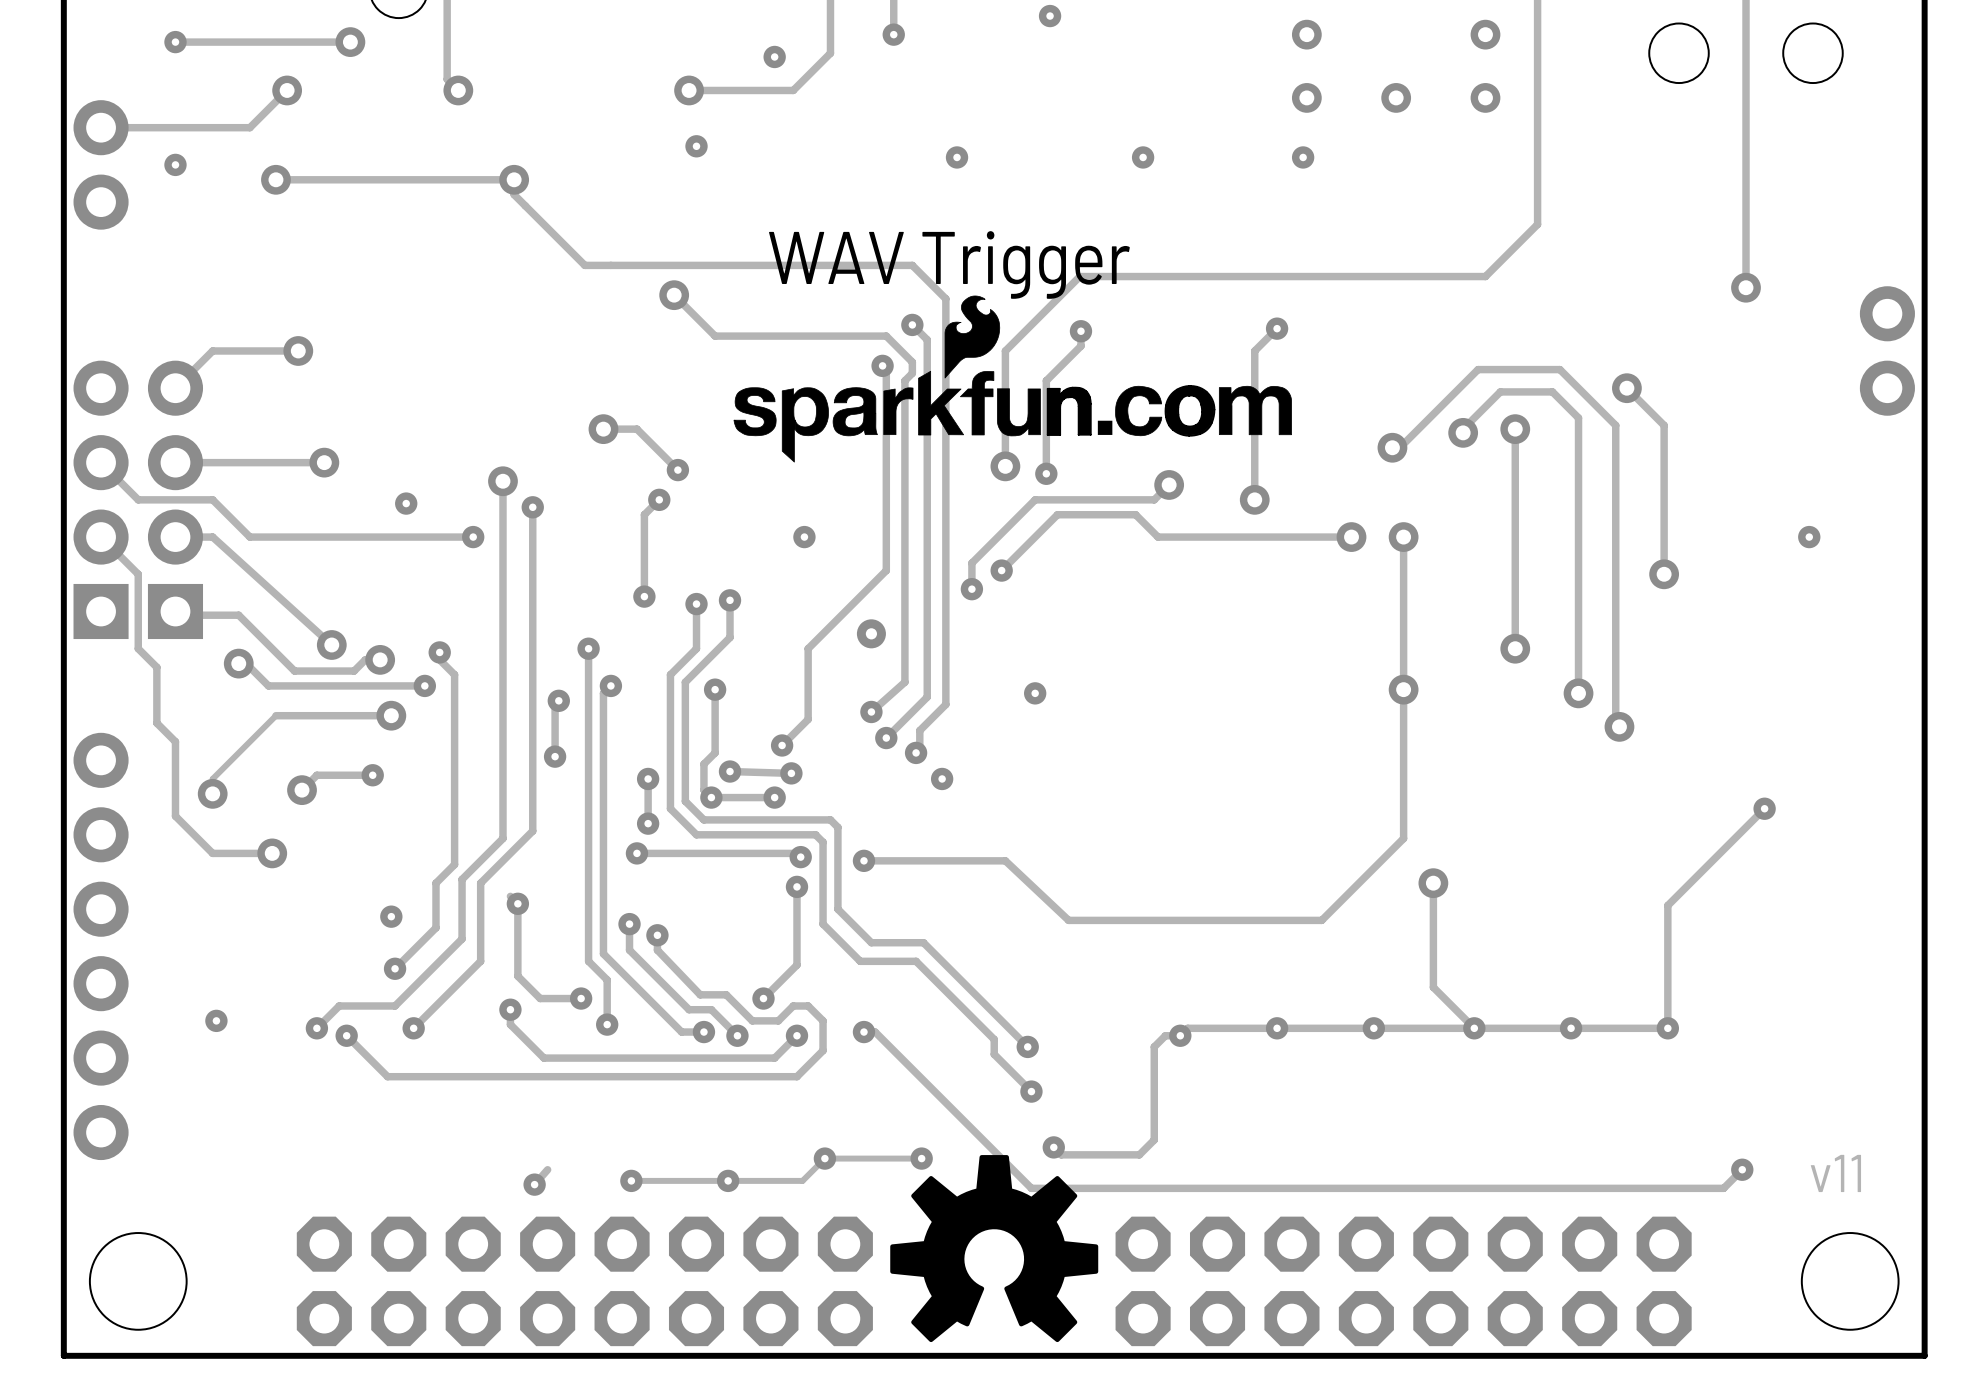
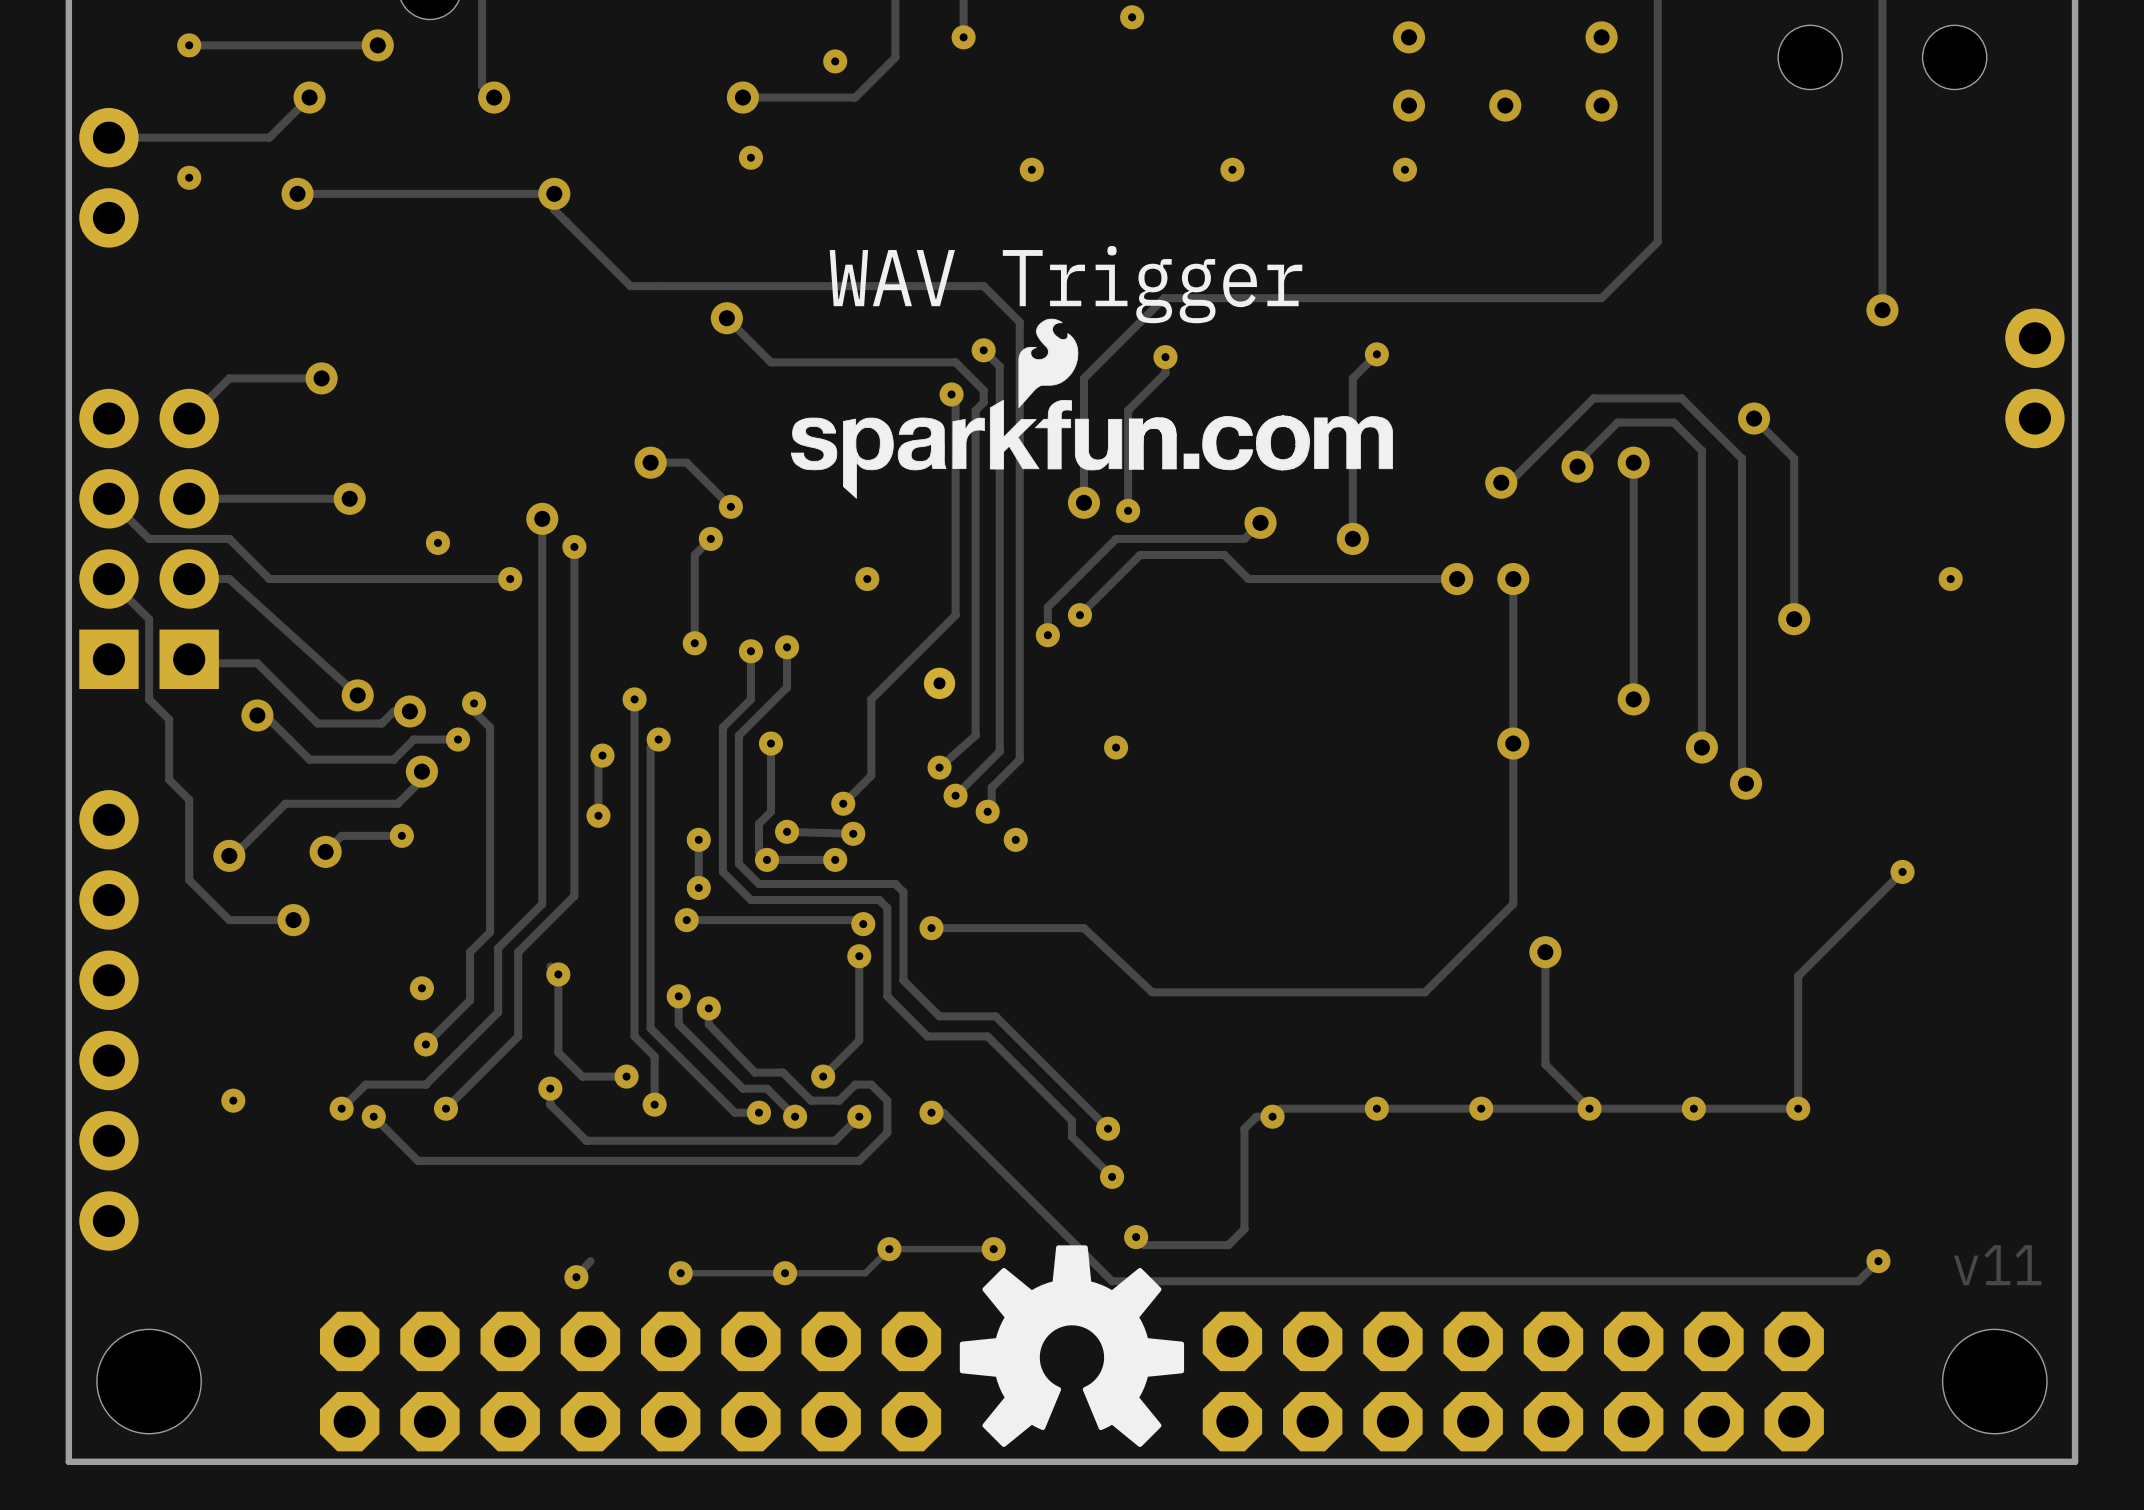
track: (383, 685) (268, 685) -> (413, 739) (393, 759) (309, 759) (289, 739)
track: (391, 715) (275, 715) (212, 778) (212, 793) -> (429, 771) (397, 803) (285, 803) (233, 855) (229, 855)

